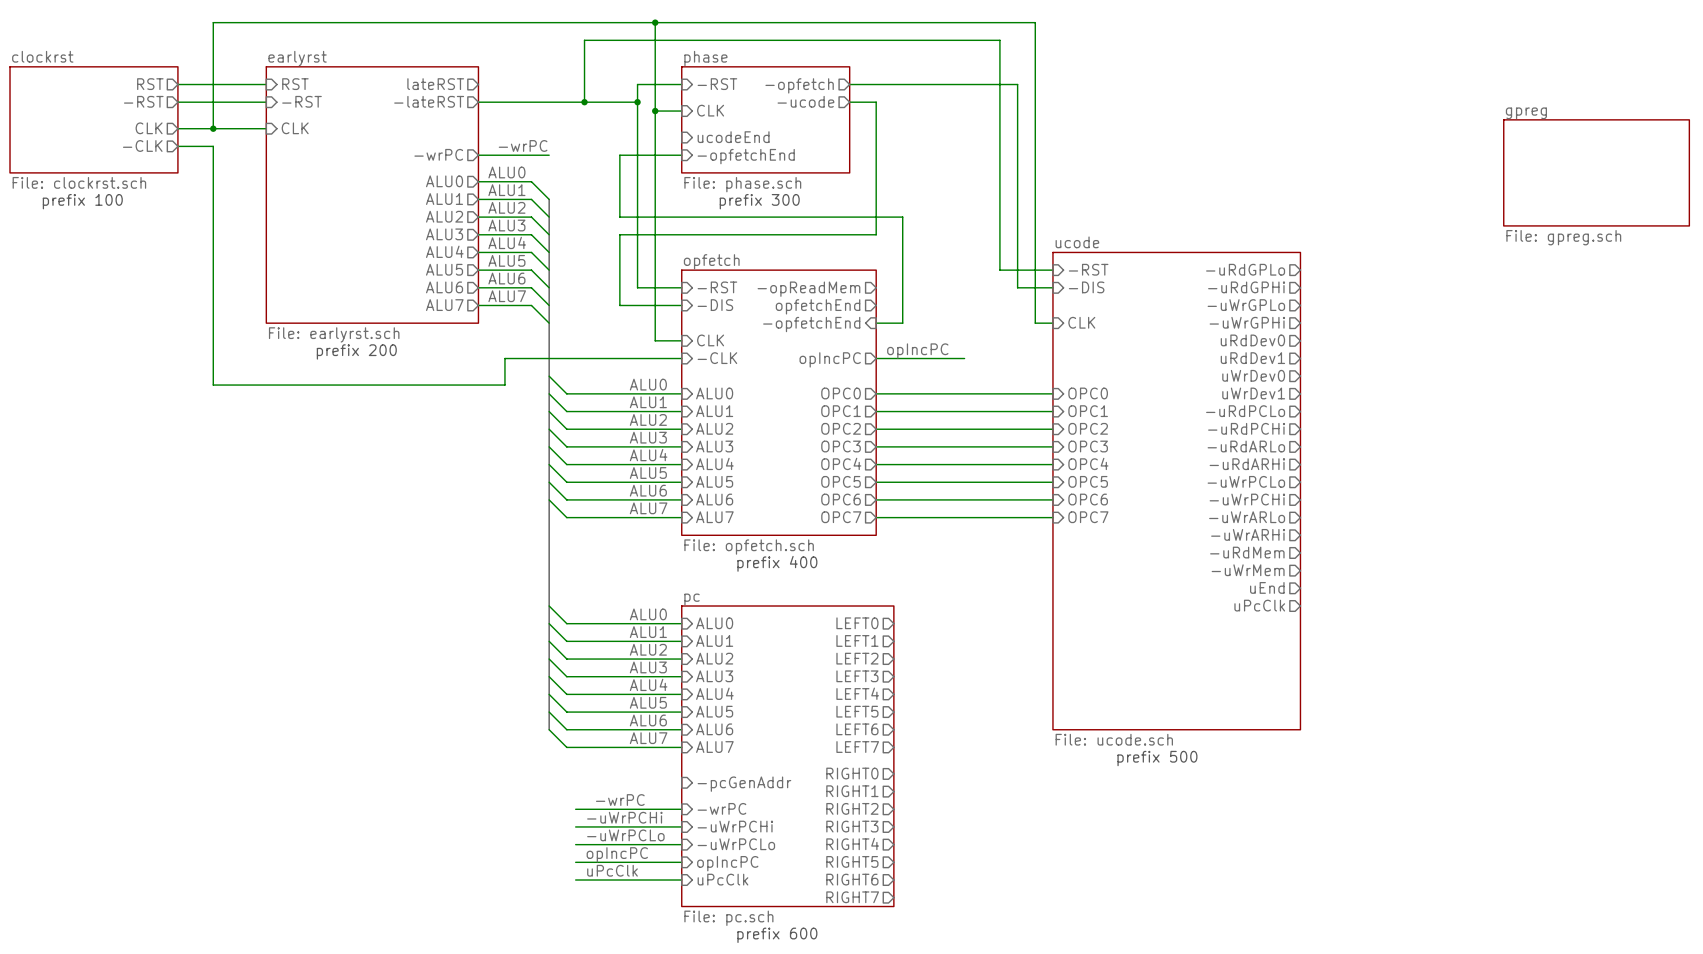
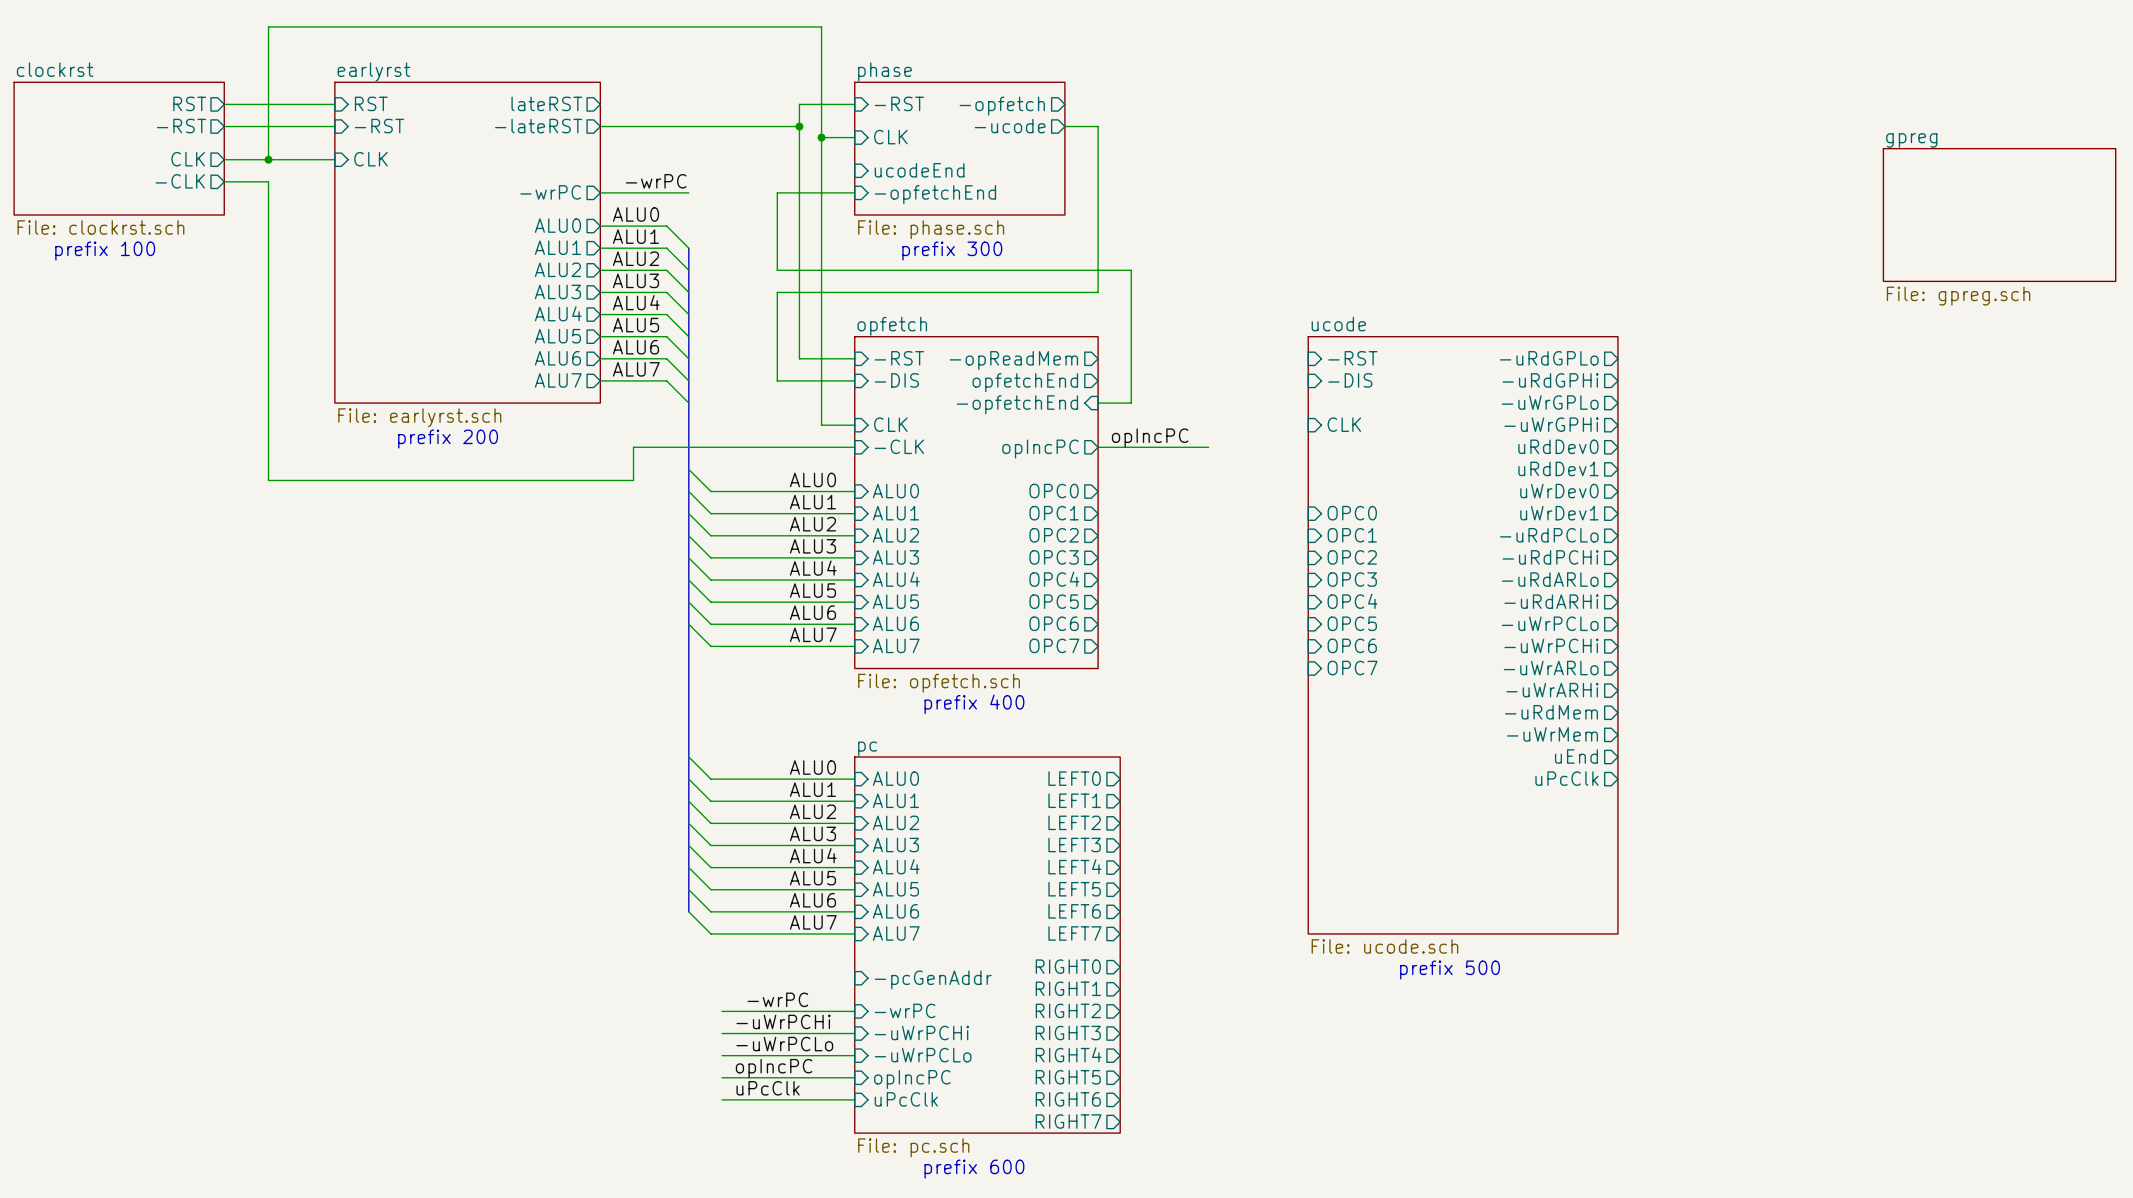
wire: (655, 22) (1035, 22) (1035, 323) (1052, 323) -> none
junction: (655, 22) -> none
wire: (849, 84) (1017, 84) (1017, 287) (1052, 287) -> none
wire: (584, 102) (584, 40) (999, 40) (999, 270) (1052, 270) -> none
junction: (584, 102) -> none
sheet pin position: -RST (1088, 269) -> -RST (1352, 358)
sheet pin position: -uRdGPLo (1245, 269) -> -uRdGPLo (1549, 358)
sheet pin position: -DIS (1086, 287) -> -DIS (1350, 380)
sheet pin position: -uRdGPHi (1246, 287) -> -uRdGPHi (1550, 380)
sheet pin position: -uWrGPLo (1246, 305) -> -uWrGPLo (1550, 402)
sheet pin position: CLK (1081, 322) -> CLK (1344, 424)
sheet pin position: -uWrGPHi (1247, 322) -> -uWrGPHi (1551, 424)
sheet pin position: uRdDev0 (1252, 340) -> uRdDev0 (1558, 446)
sheet pin position: uRdDev1 (1252, 358) -> uRdDev1 (1558, 468)
sheet pin position: uWrDev0 (1253, 375) -> uWrDev0 (1559, 491)
wire: (876, 393) (1052, 393) -> none
sheet pin position: OPC0 (1088, 393) -> OPC0 (1352, 513)
sheet pin position: uWrDev1 (1253, 393) -> uWrDev1 (1559, 513)
wire: (876, 411) (1052, 411) -> none
sheet pin position: OPC1 (1088, 411) -> OPC1 (1352, 535)
sheet pin position: -uRdPCLo (1245, 411) -> -uRdPCLo (1549, 535)
sheet pin position: OPC2 (1088, 428) -> OPC2 (1352, 557)
sheet pin position: -uRdPCHi (1246, 428) -> -uRdPCHi (1550, 557)
wire: (876, 429) (1052, 429) -> none
wire: (876, 446) (1052, 446) -> none
sheet pin position: OPC3 (1088, 446) -> OPC3 (1352, 579)
sheet pin position: -uRdARLo (1246, 446) -> -uRdARLo (1550, 579)
sheet pin position: OPC4 (1088, 463) -> OPC4 (1352, 601)
wire: (876, 464) (1052, 464) -> none
sheet pin position: -uRdARHi (1247, 464) -> -uRdARHi (1551, 601)
sheet pin position: OPC5 (1088, 481) -> OPC5 (1352, 623)
sheet pin position: -uWrPCLo (1246, 481) -> -uWrPCLo (1550, 623)
wire: (876, 482) (1052, 482) -> none
sheet ucode position: (1176, 491) -> (1463, 635)
wire: (876, 499) (1052, 499) -> none
sheet pin position: OPC6 (1088, 499) -> OPC6 (1352, 645)
sheet pin position: -uWrPCHi (1247, 499) -> -uWrPCHi (1551, 645)
wire: (876, 517) (1052, 517) -> none
sheet pin position: OPC7 (1088, 517) -> OPC7 (1352, 668)
sheet pin position: -uWrARLo (1247, 517) -> -uWrARLo (1551, 668)
sheet pin position: -uWrARHi (1248, 534) -> -uWrARHi (1552, 690)
sheet pin position: -uRdMem (1247, 552) -> -uRdMem (1551, 712)
sheet pin position: -uWrMem (1248, 570) -> -uWrMem (1552, 734)
sheet pin position: uEnd (1267, 587) -> uEnd (1576, 756)
sheet pin position: uPcClk (1259, 605) -> uPcClk (1566, 778)
text position: prefix 500 (1157, 758) -> prefix 500 (1450, 969)

